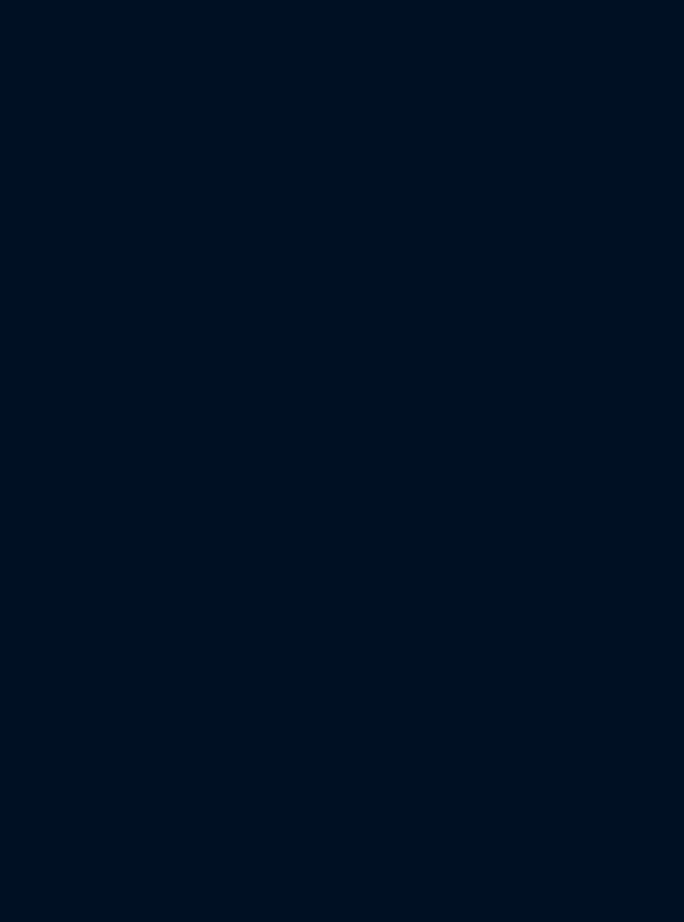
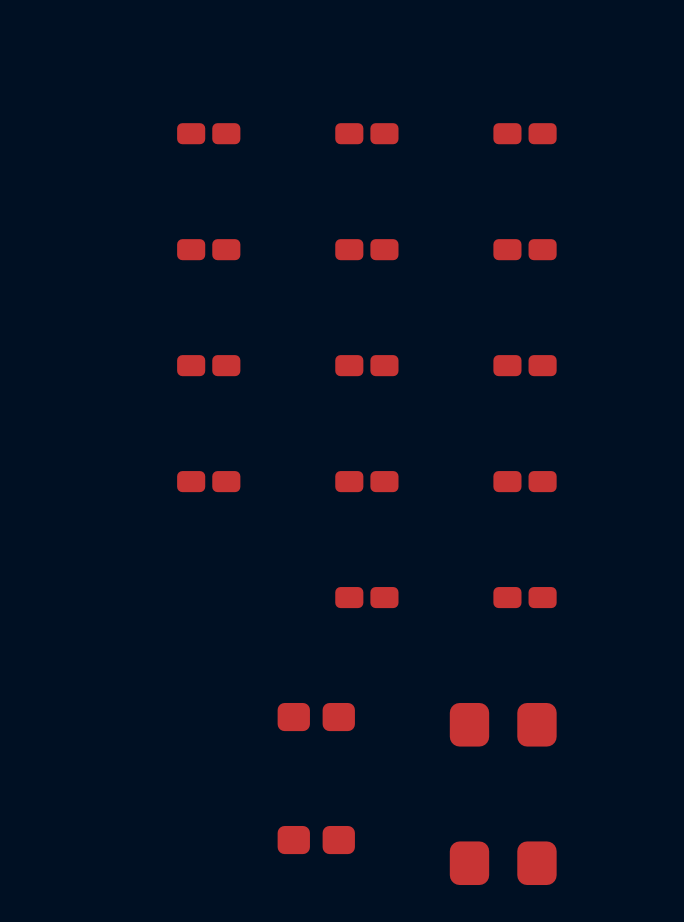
part: none -> (208, 133)
part: none -> (366, 133)
part: none -> (525, 133)
part: none -> (208, 249)
part: none -> (366, 249)
part: none -> (525, 249)
part: none -> (208, 365)
part: none -> (366, 365)
part: none -> (525, 365)
part: none -> (208, 481)
part: none -> (366, 481)
part: none -> (525, 481)
part: none -> (366, 597)
part: none -> (525, 597)
part: none -> (316, 717)
part: none -> (503, 724)
part: none -> (316, 840)
part: none -> (503, 863)

